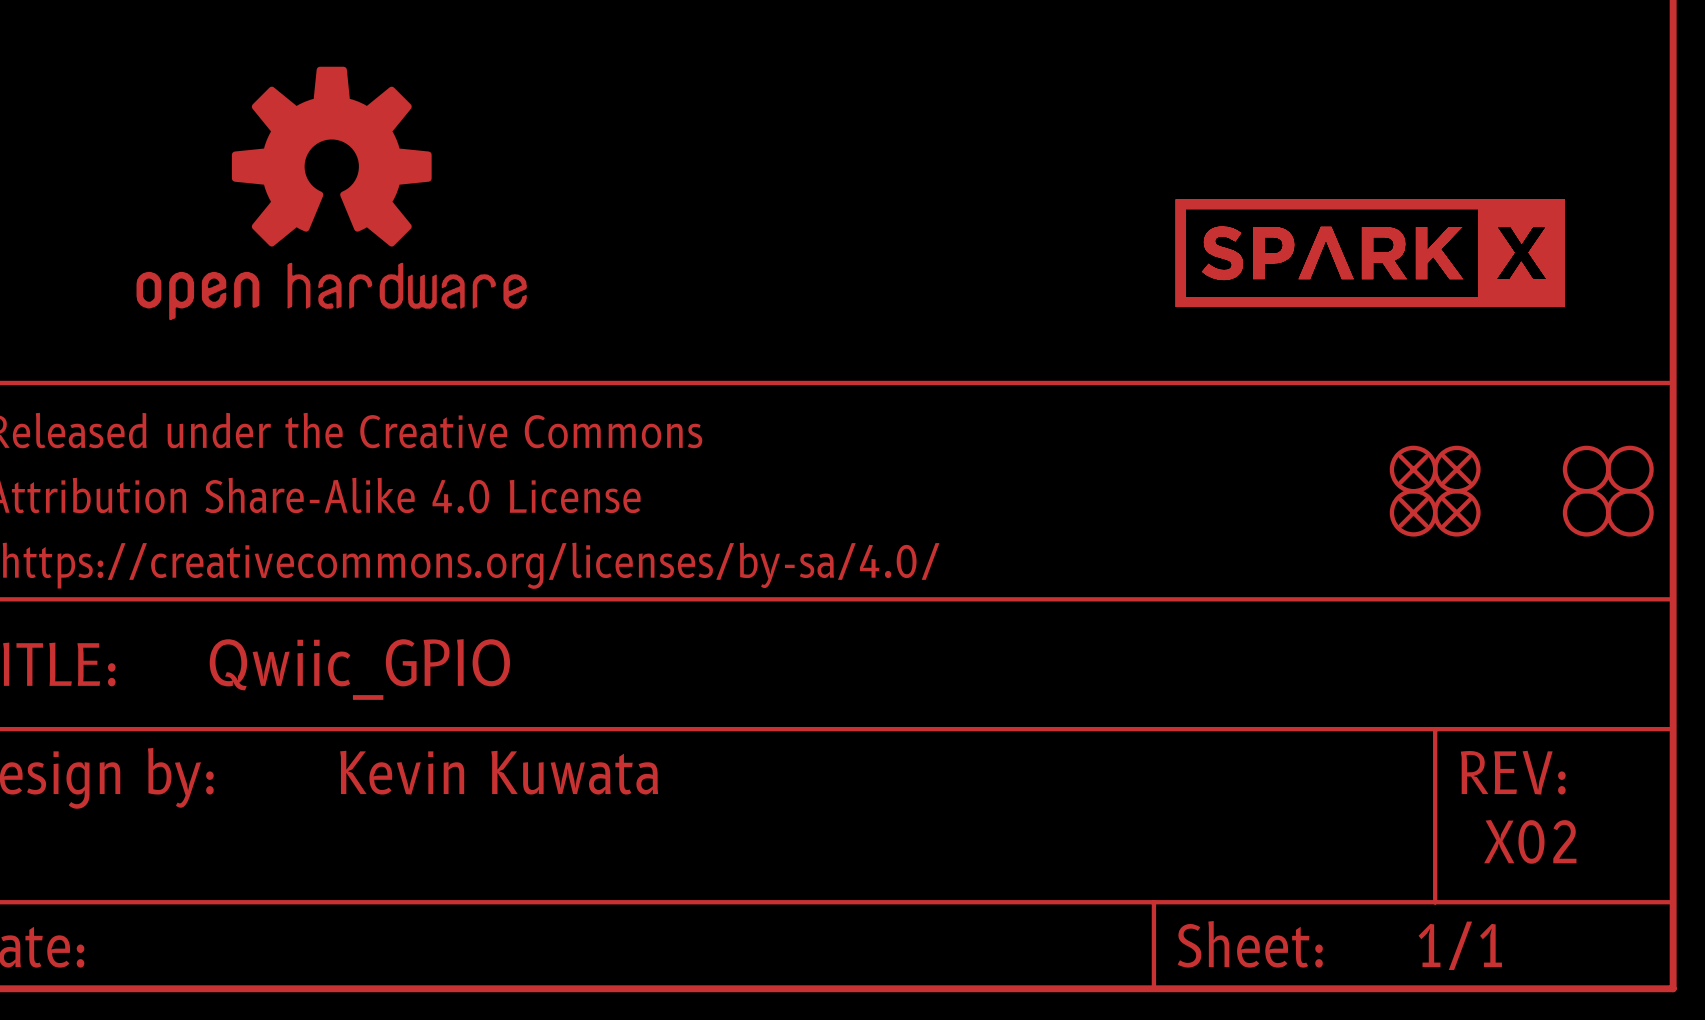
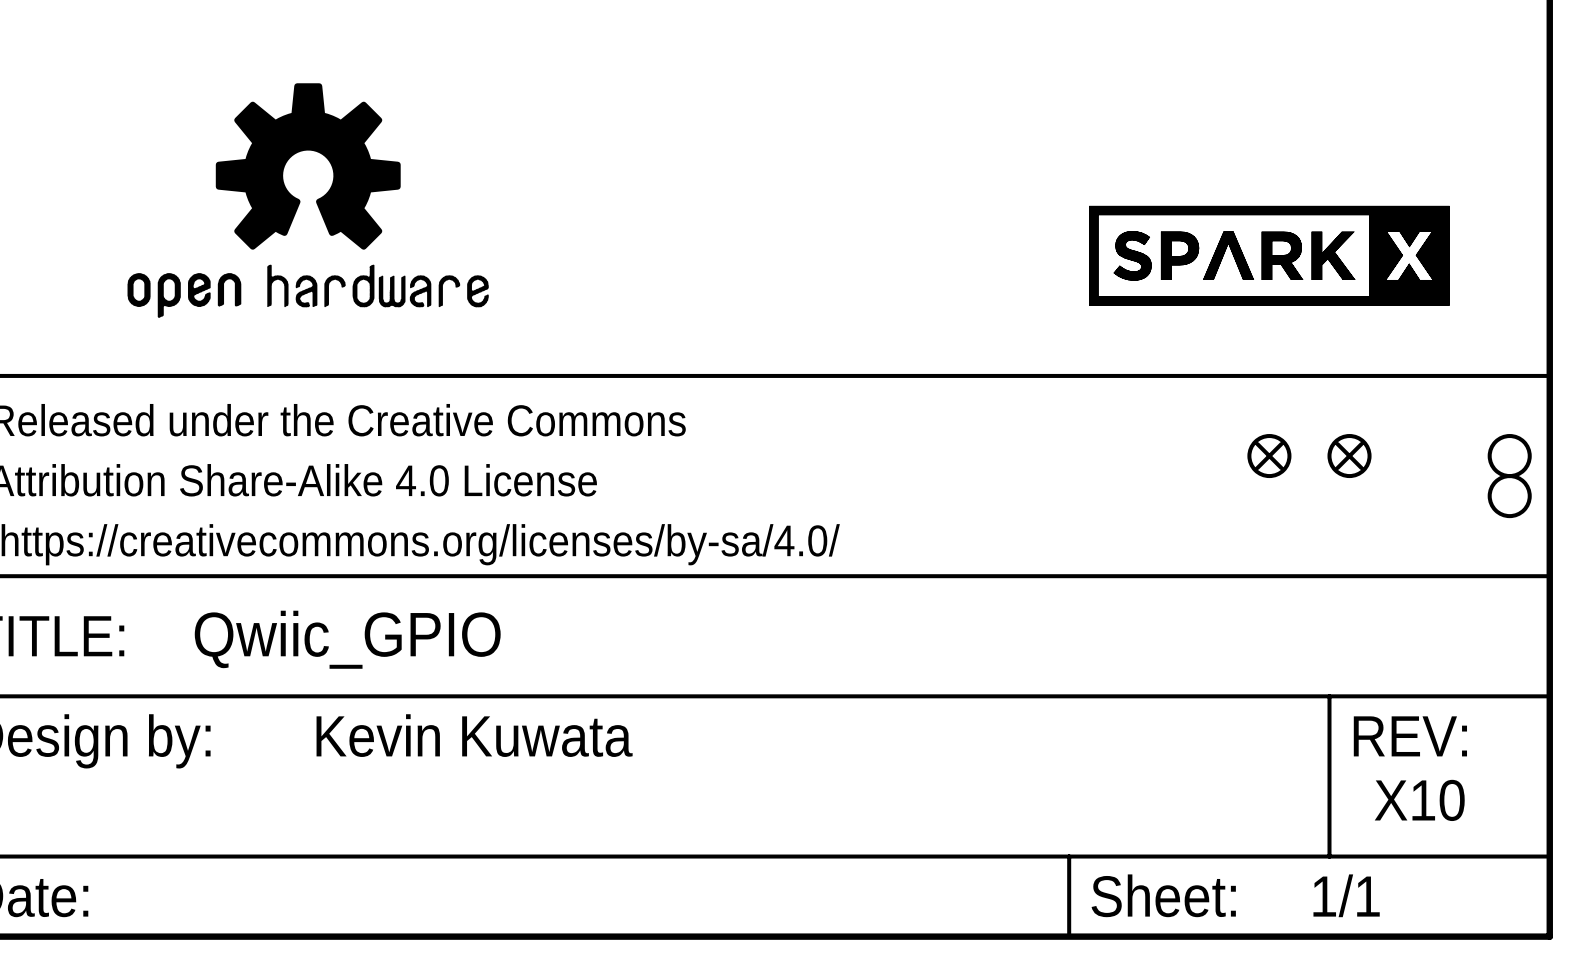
part: none -> (1269, 456)
part: (1413, 469) -> none
part: (1586, 469) -> none
part: (1413, 512) -> none
part: (1456, 512) -> none
part: (1586, 512) -> none
text: X02 (1530, 841) -> X10 (1419, 800)

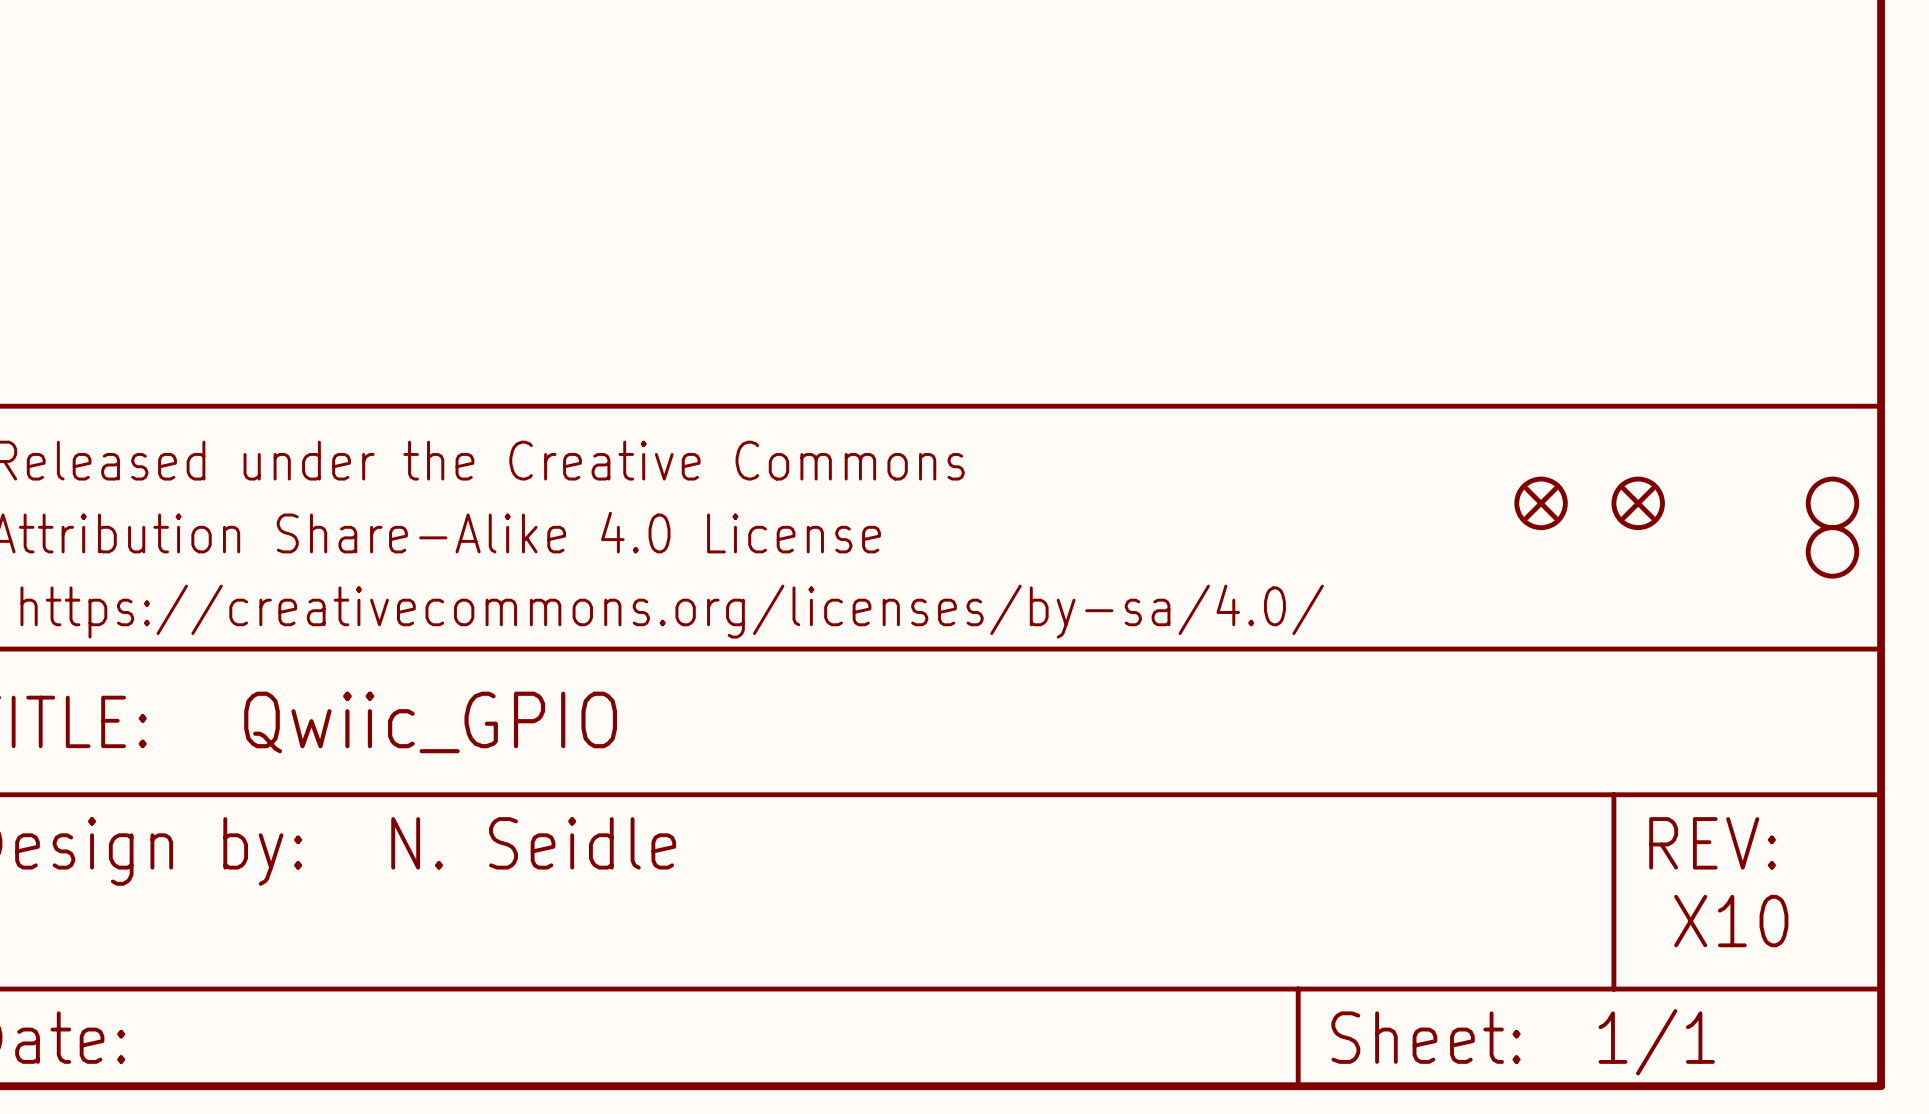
part: (308, 200) -> none
part: (1269, 255) -> none
text: Kevin Kuwata (474, 735) -> N. Seidle (533, 843)

